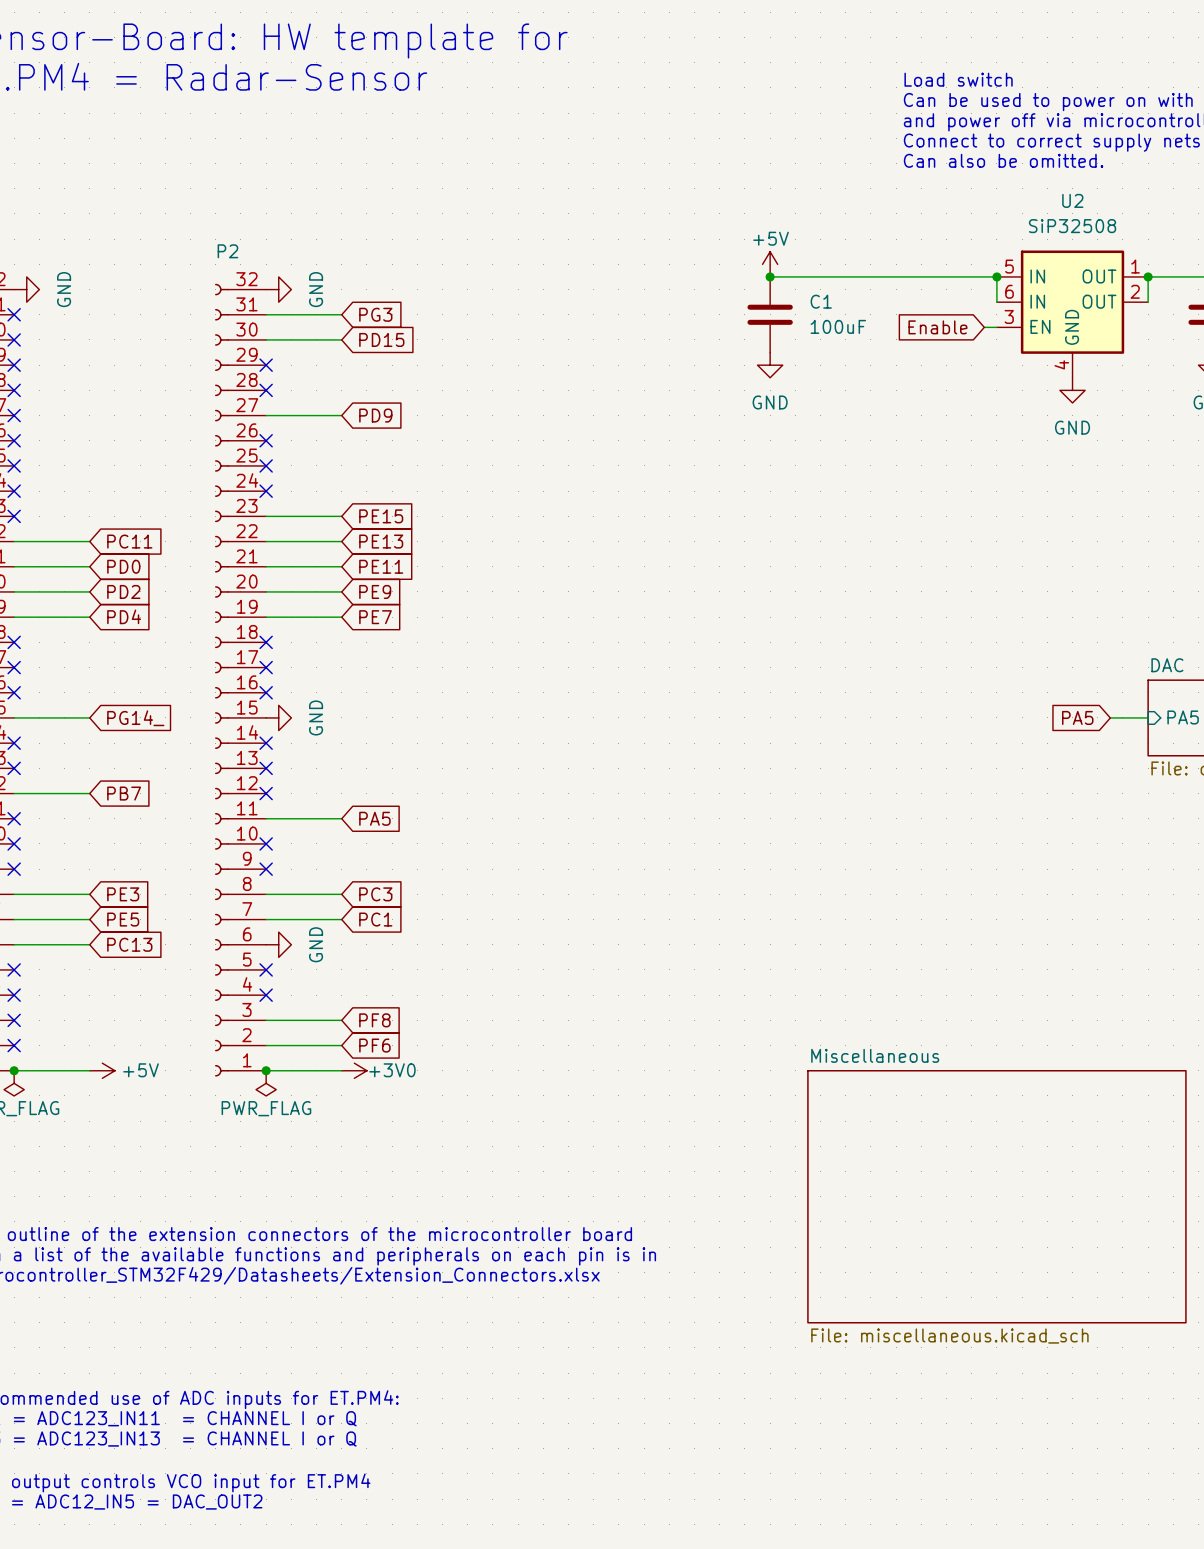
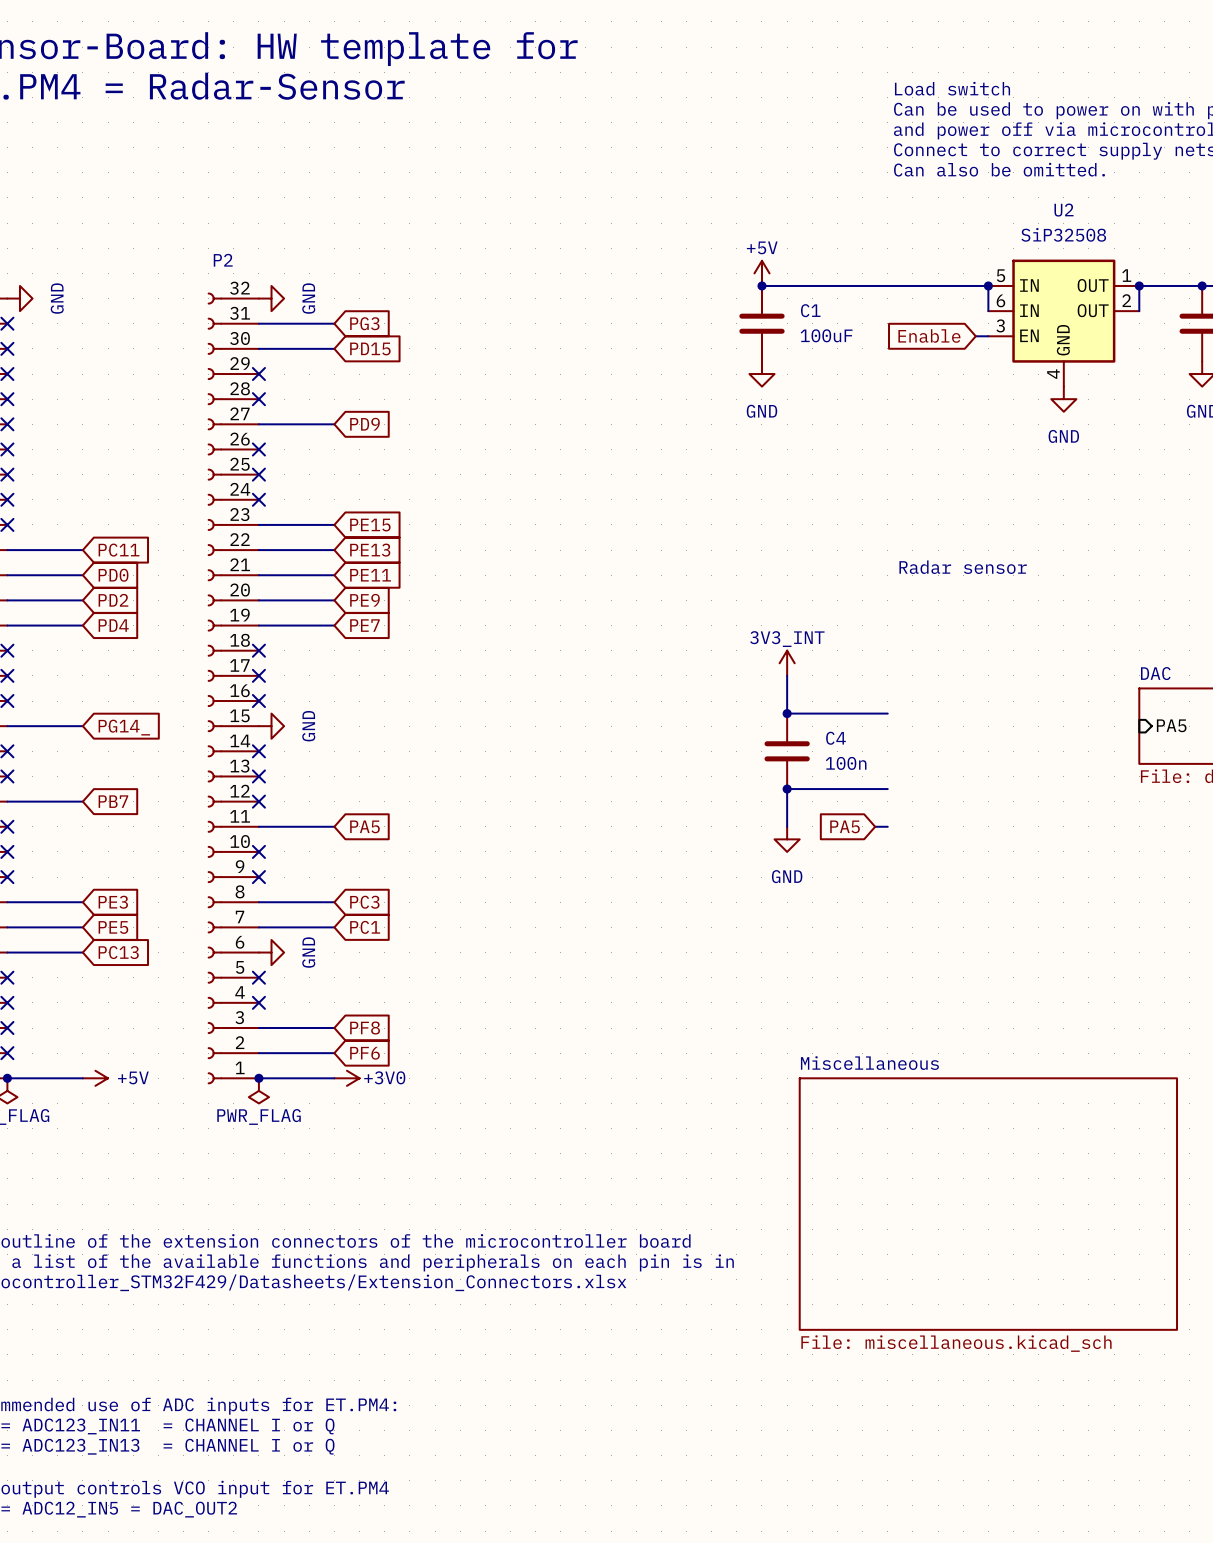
text: none -> Radar sensor (963, 567)
power symbol: none -> 3V3_INT (787, 663)
wire: none -> (787, 675) (787, 713) (887, 713)
junction: none -> (787, 713)
global label: PA5 (1077, 717) -> none
wire: (1110, 717) (1148, 717) -> none
C4: none -> 100n (787, 751)
junction: none -> (787, 789)
wire: none -> (887, 789) (787, 789) (787, 826)
global label: none -> PA5 (845, 826)
wire: none -> (875, 826) (887, 826)
power symbol: none -> GND (787, 839)

